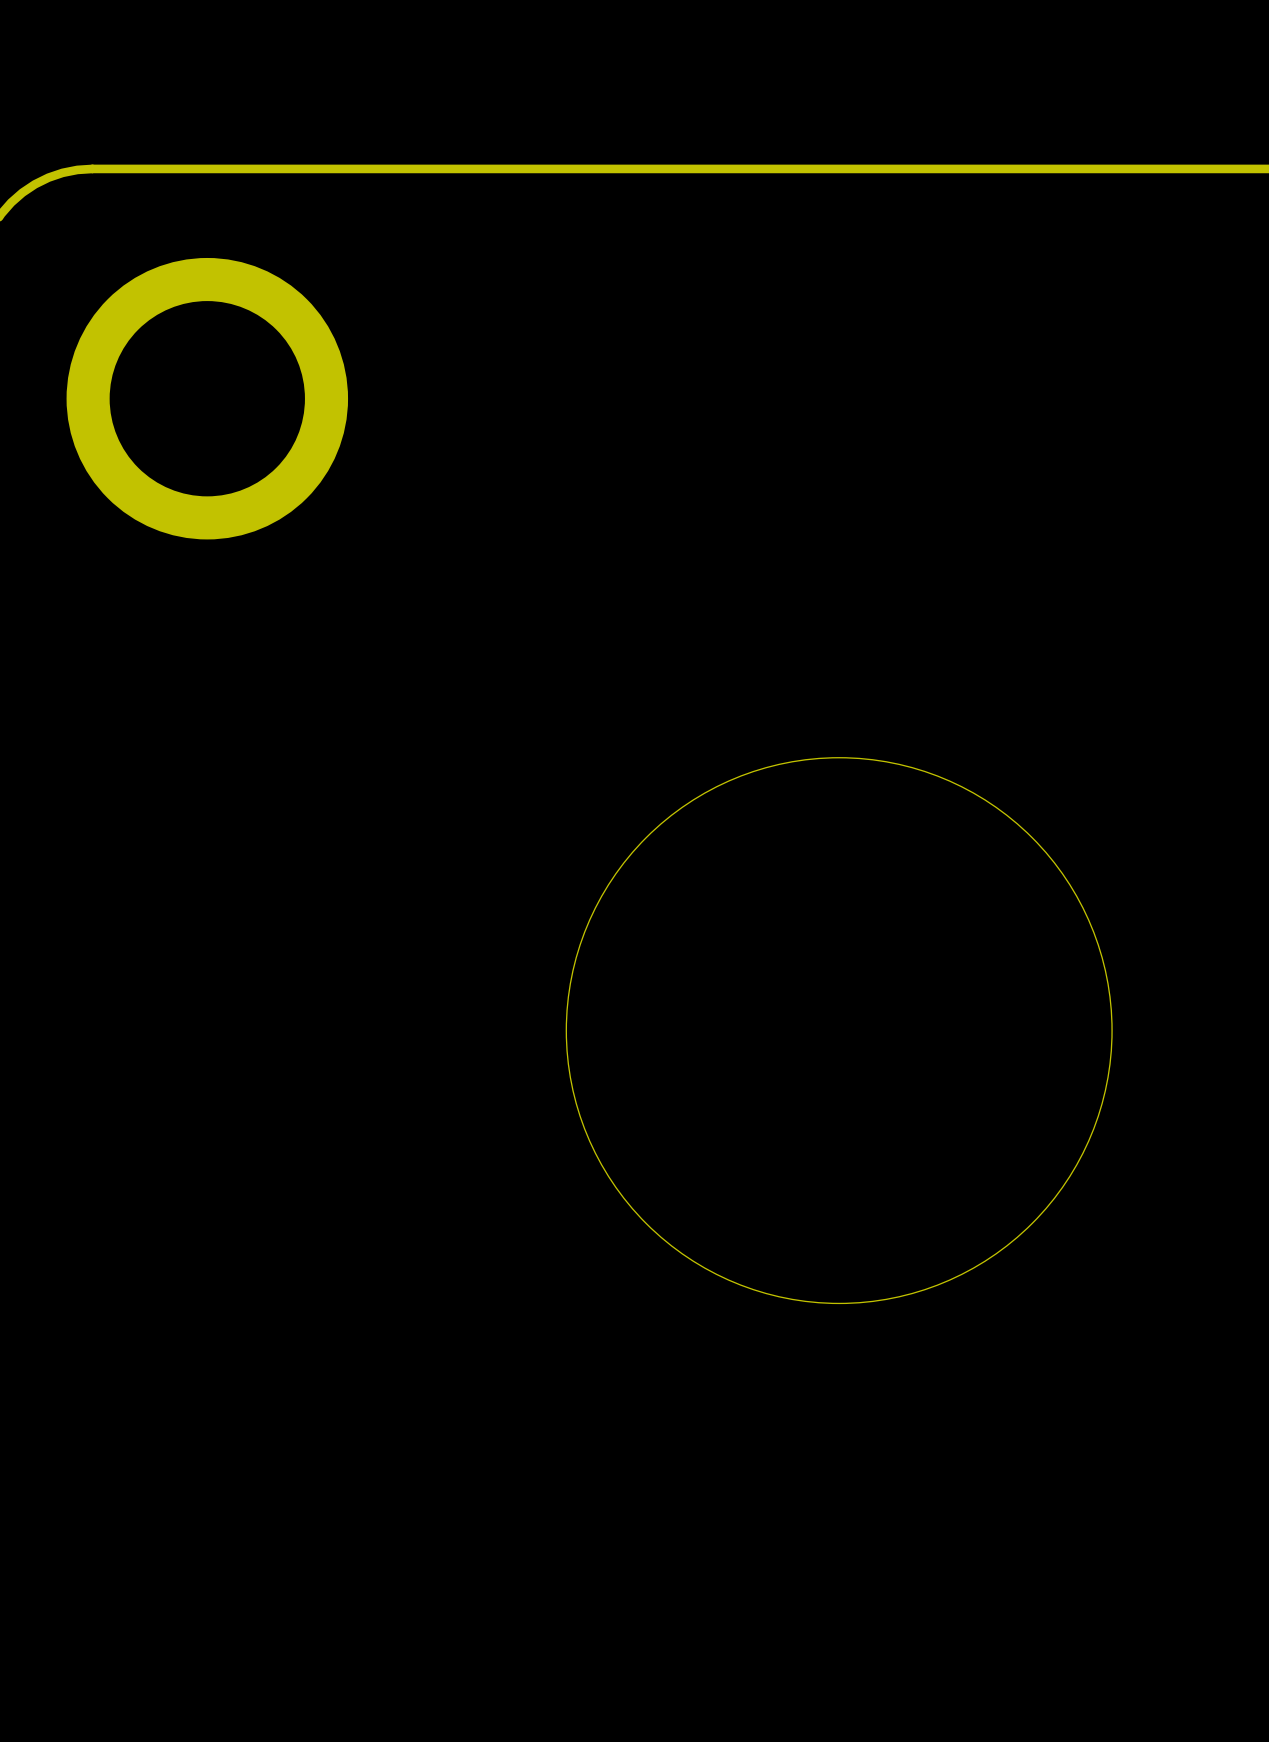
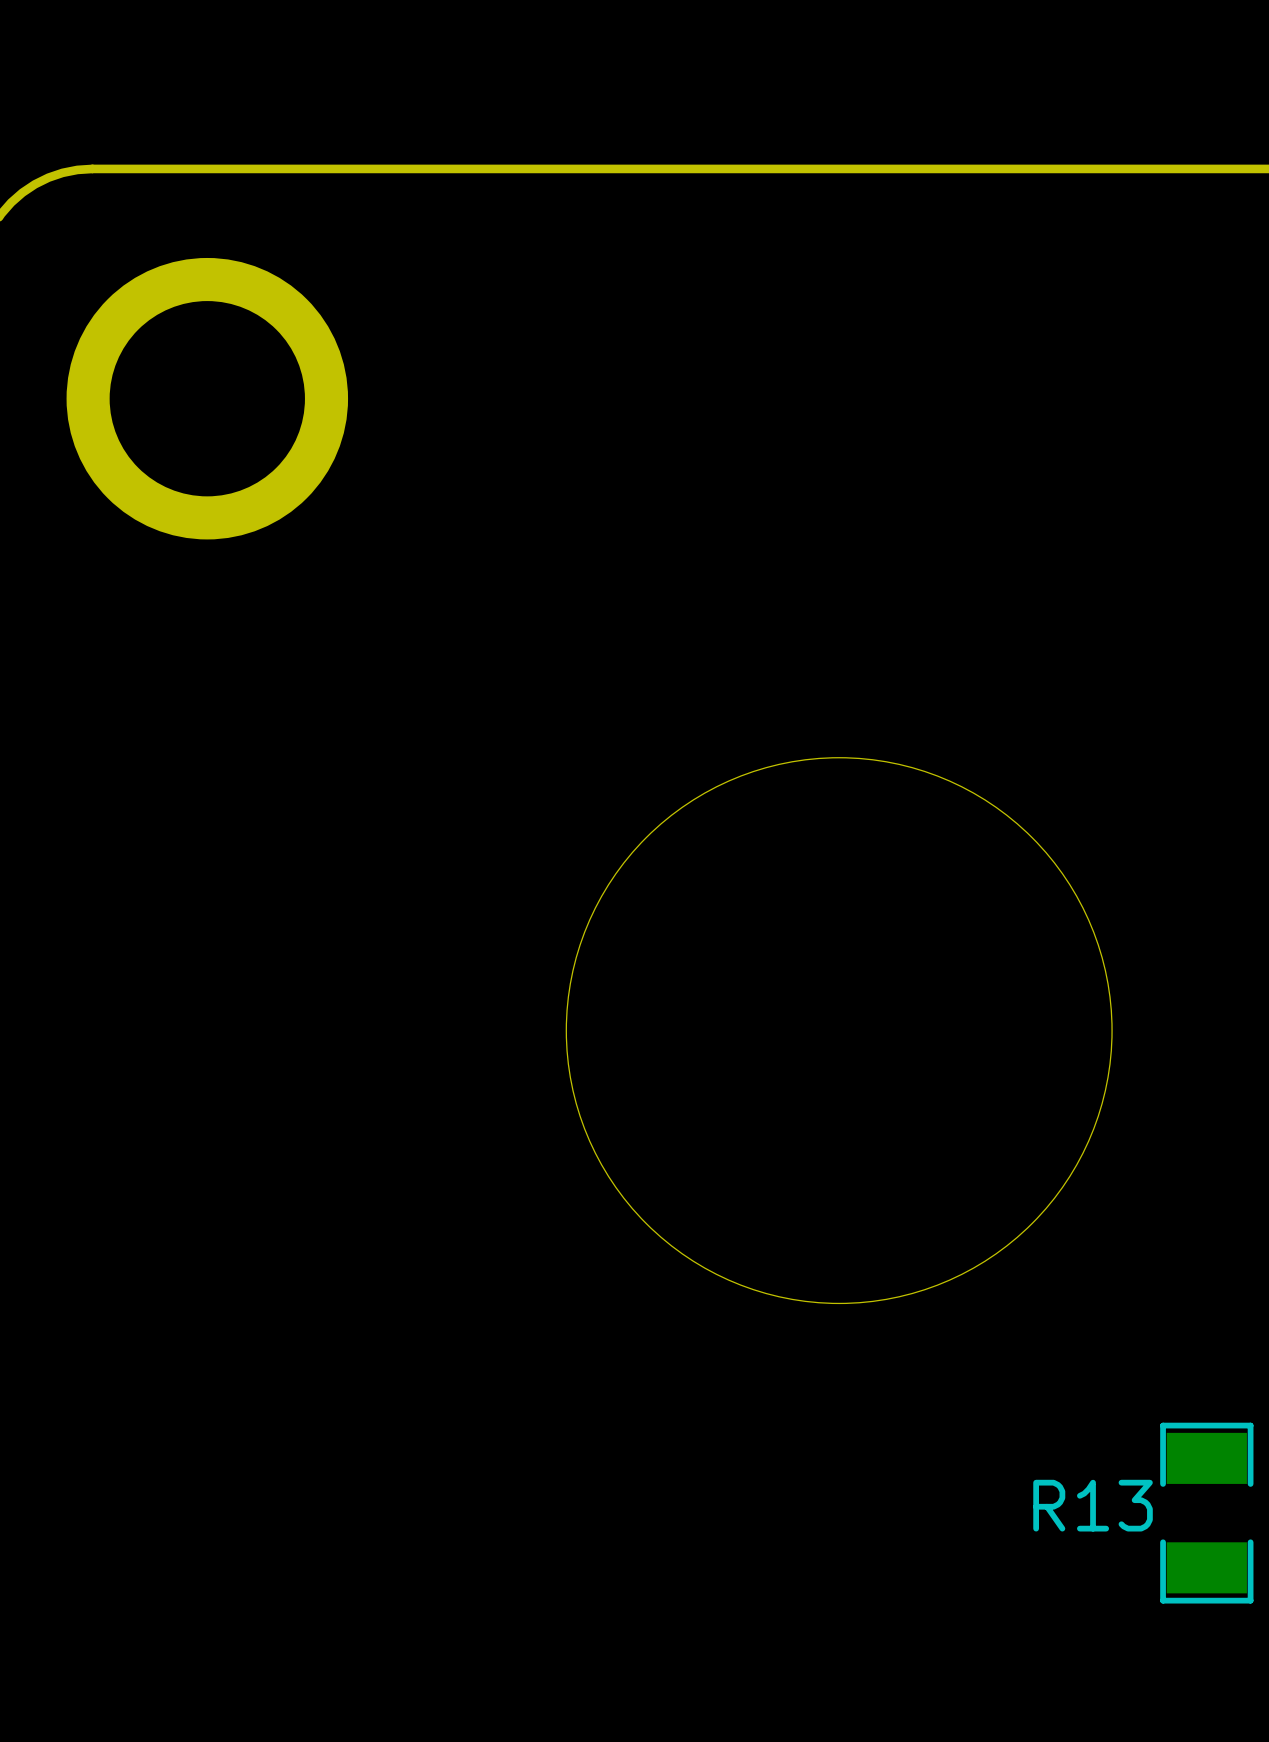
R13: none -> (1206, 1513)

